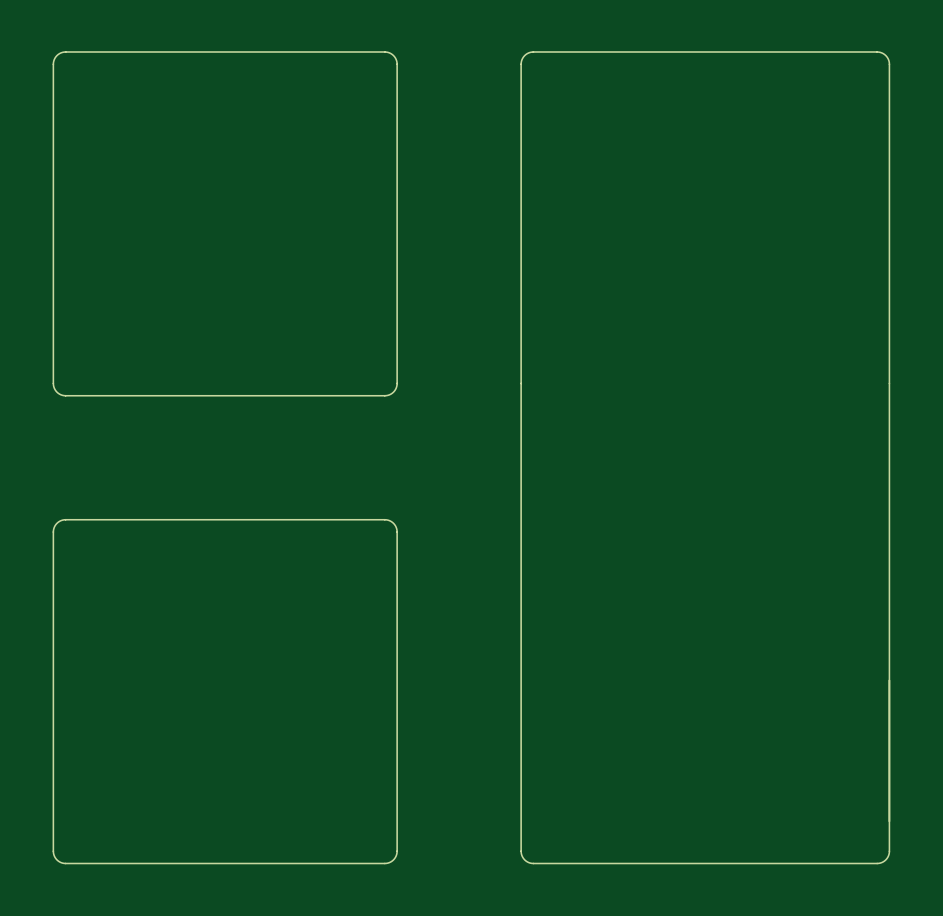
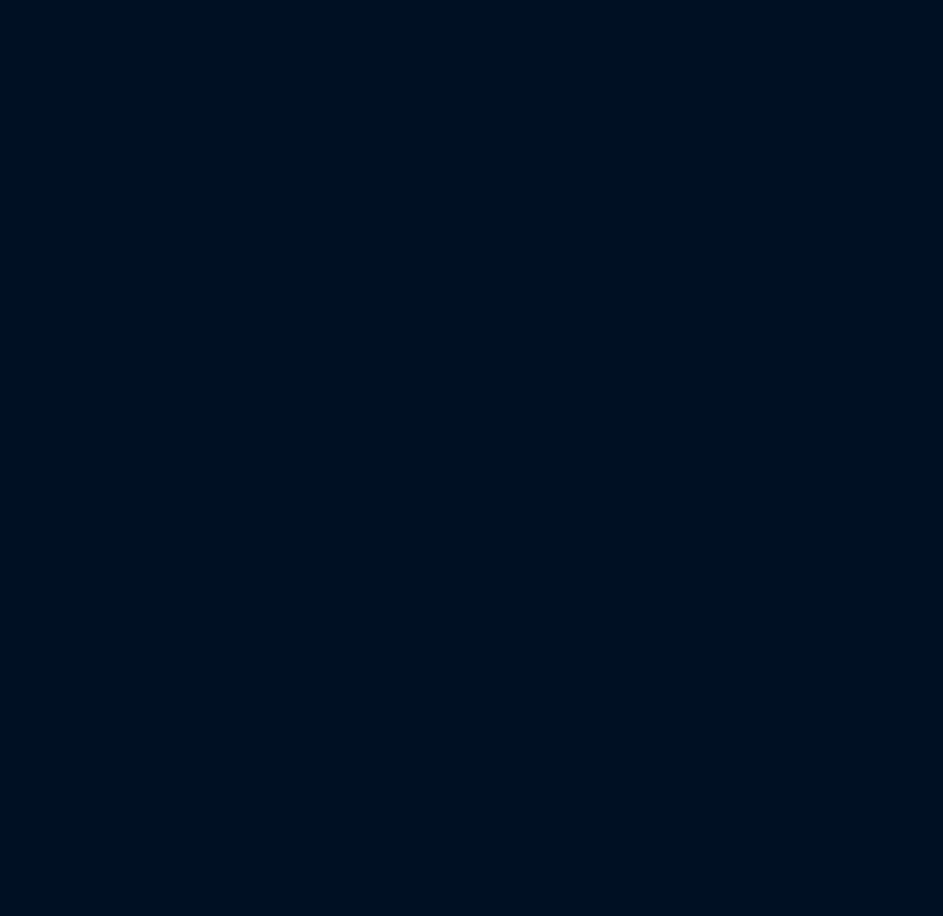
board edge: (384, 51) (65, 51) (56, 55) (53, 64) (53, 383) (56, 392) (65, 395) (384, 395) (393, 392) (397, 383) (397, 64) (393, 55) (384, 51) -> none
board edge: (877, 51) (533, 51) (525, 54) (522, 59) (521, 851) (523, 858) (528, 862) (877, 863) (884, 860) (888, 855) (889, 64) (885, 55) (877, 51) -> none
board edge: (384, 519) (65, 519) (56, 523) (53, 532) (53, 851) (56, 859) (65, 863) (384, 863) (393, 859) (397, 851) (397, 532) (393, 523) (384, 519) -> none

